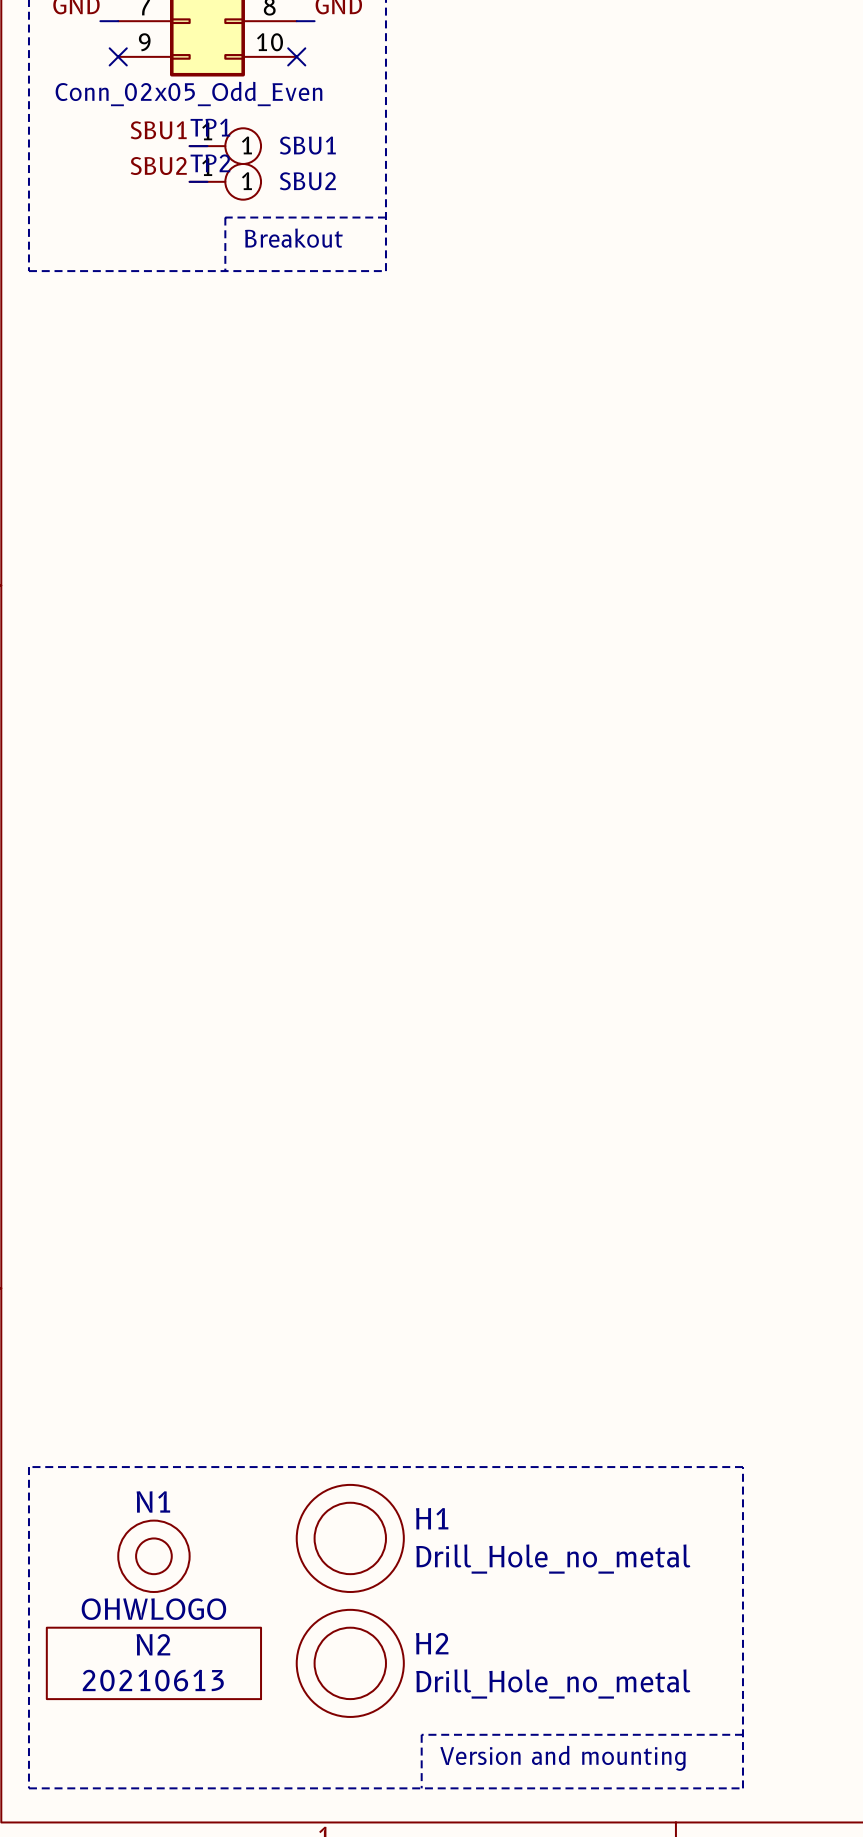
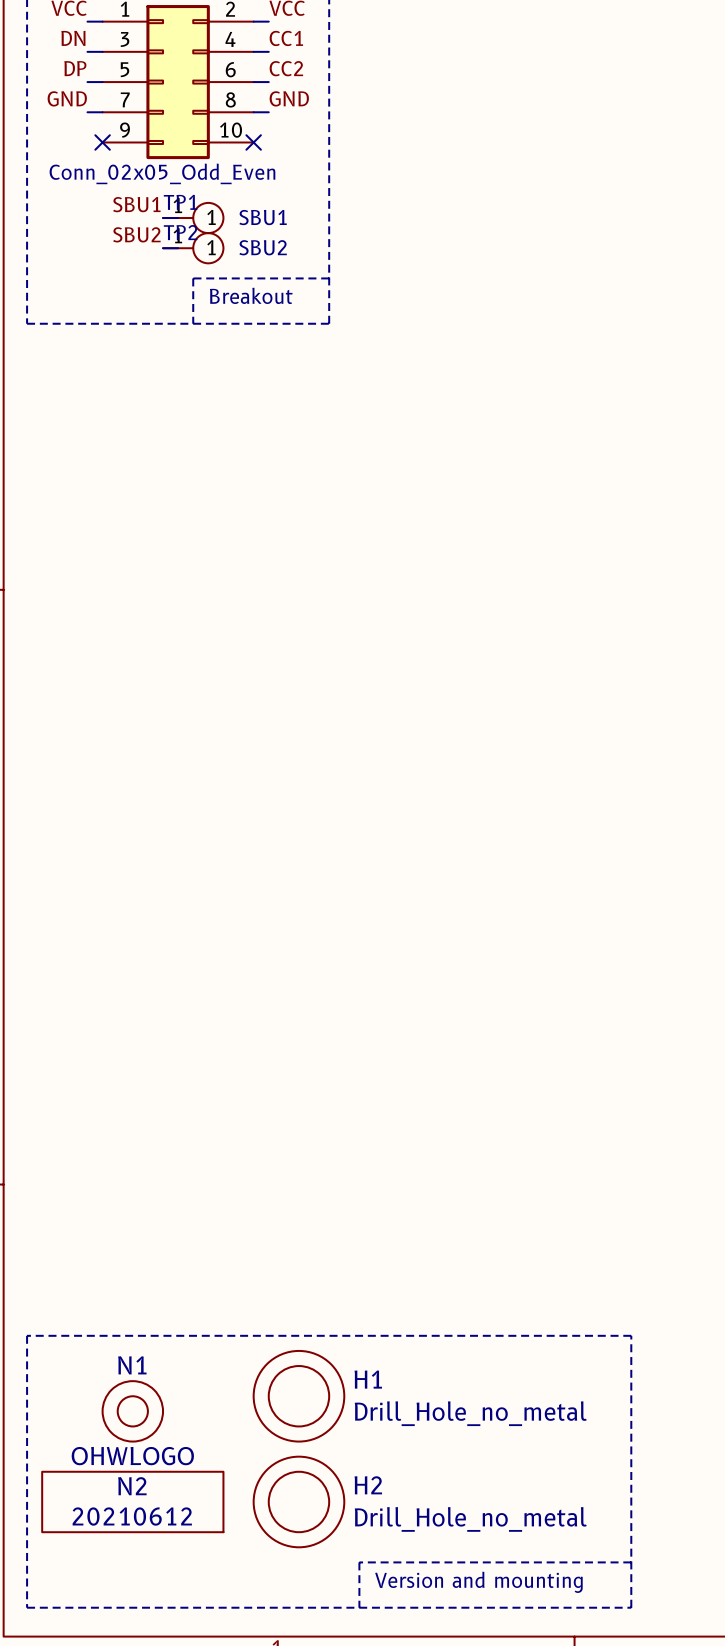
N2 value: 20210613 (153, 1680) -> 20210612 (132, 1516)

